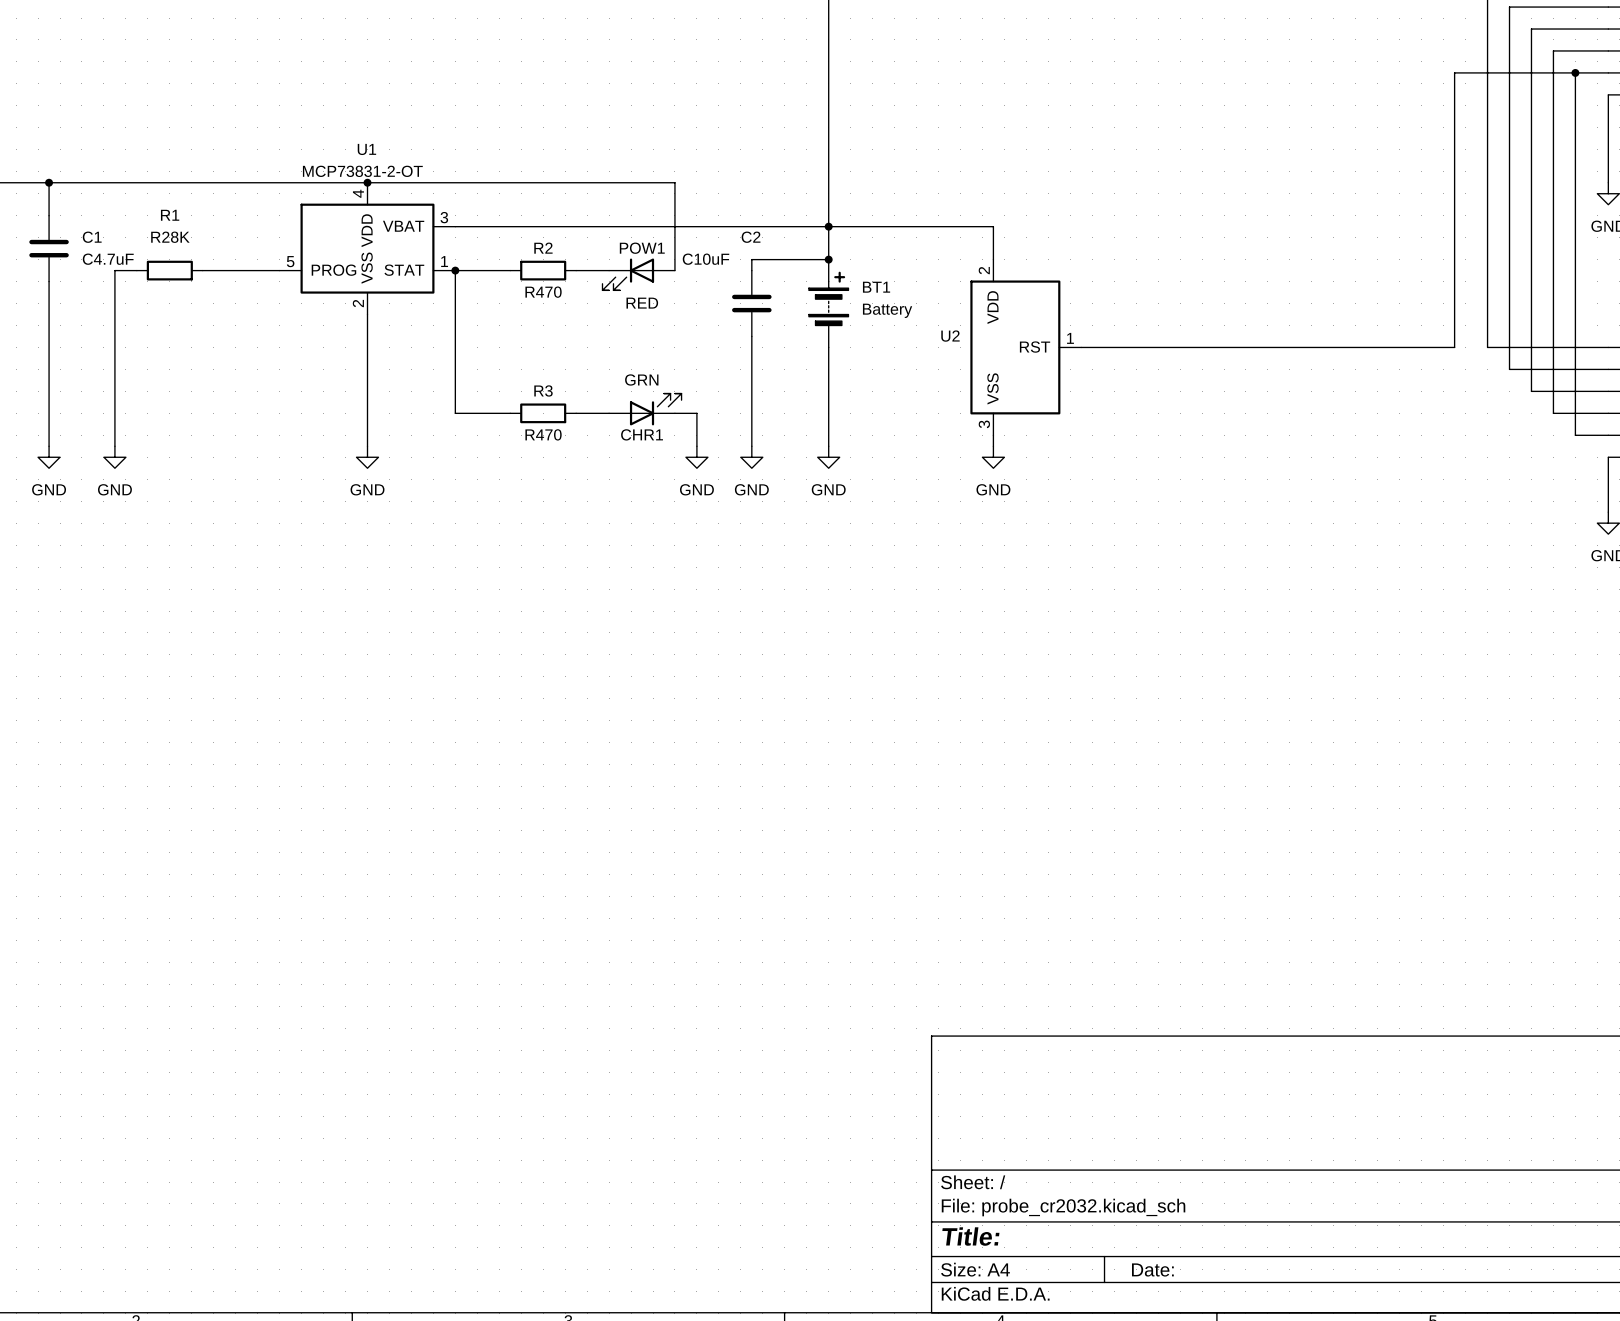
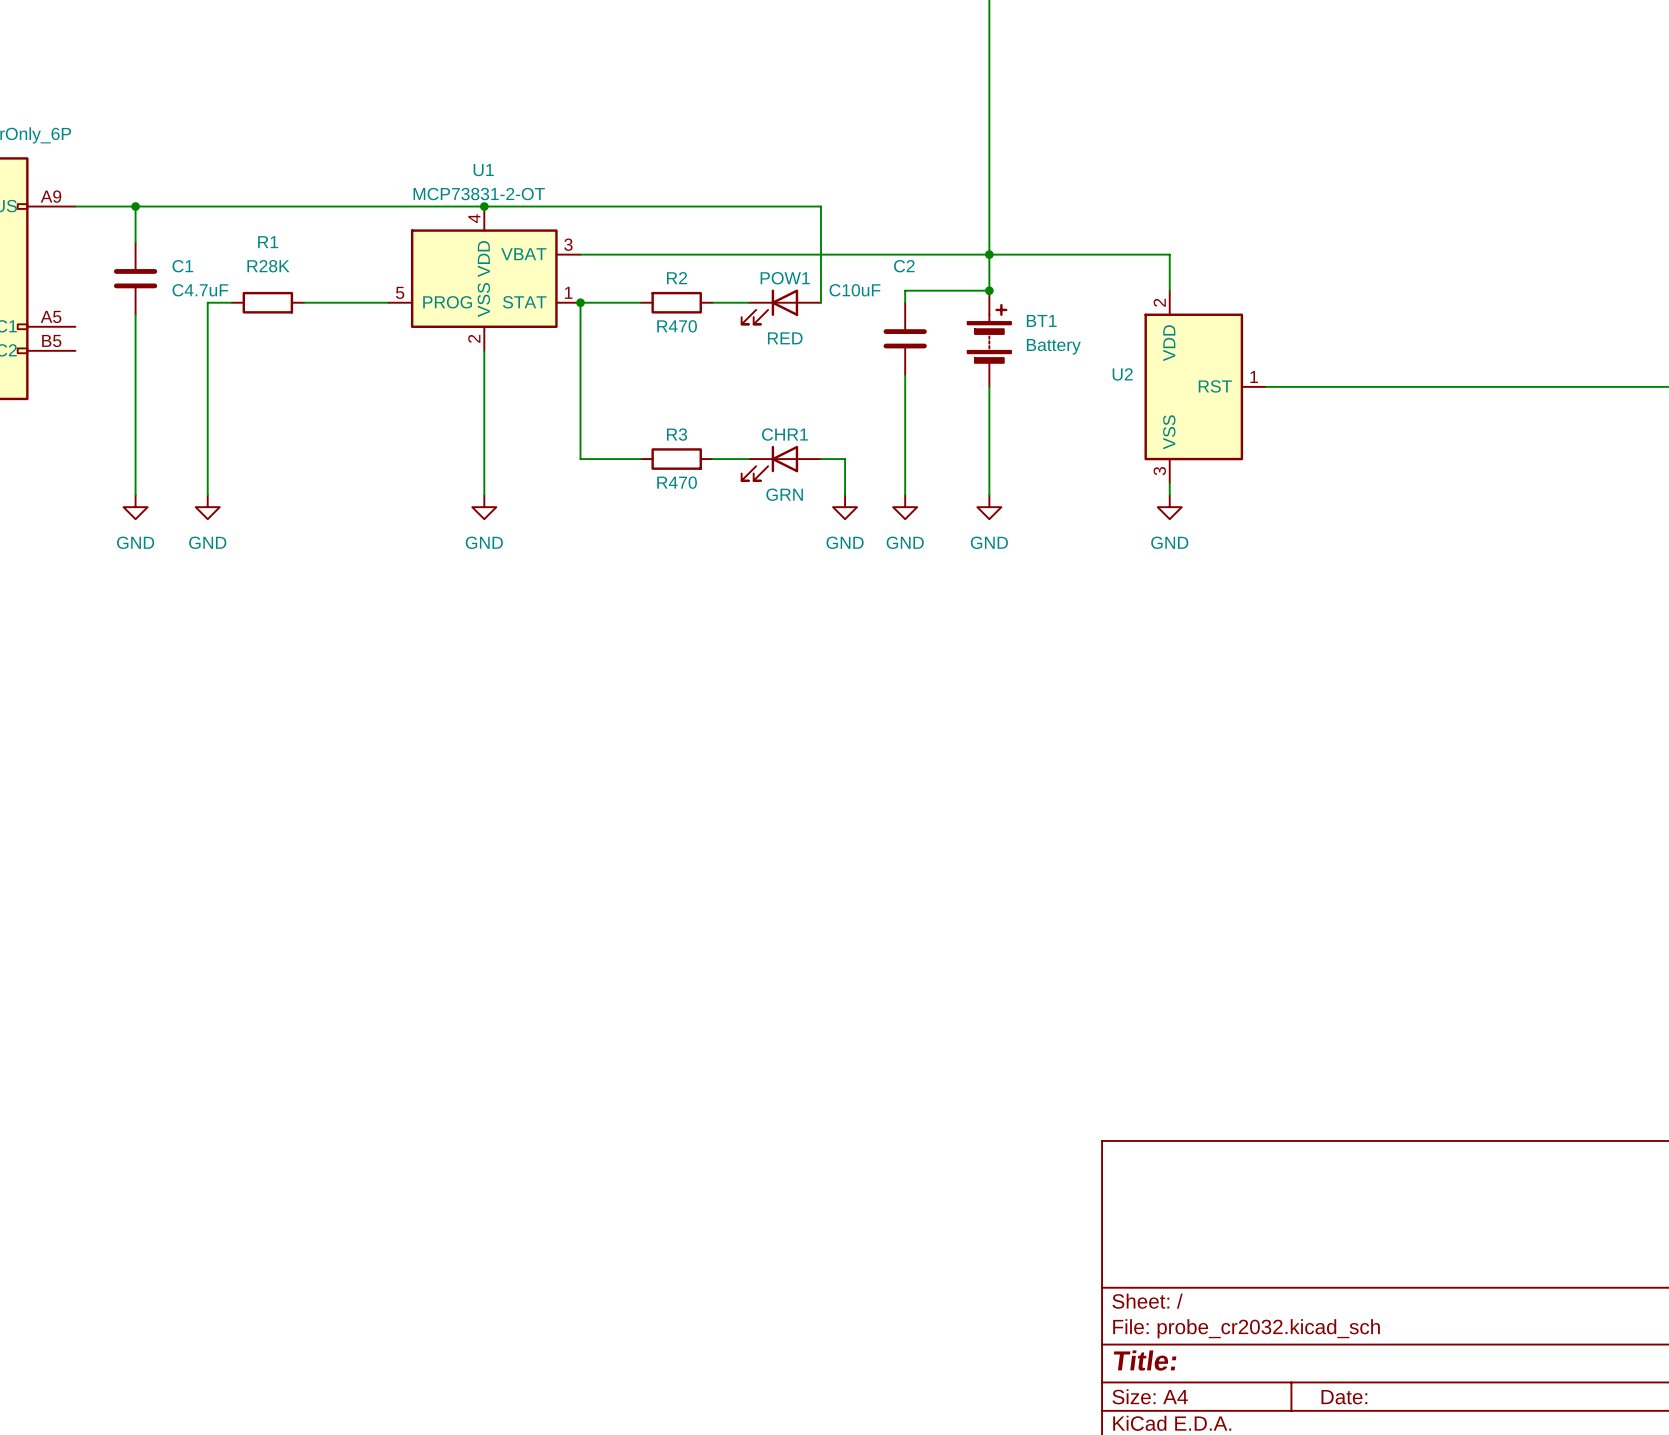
CHR1 rotation: 0° (655, 409) -> 180° (769, 463)

